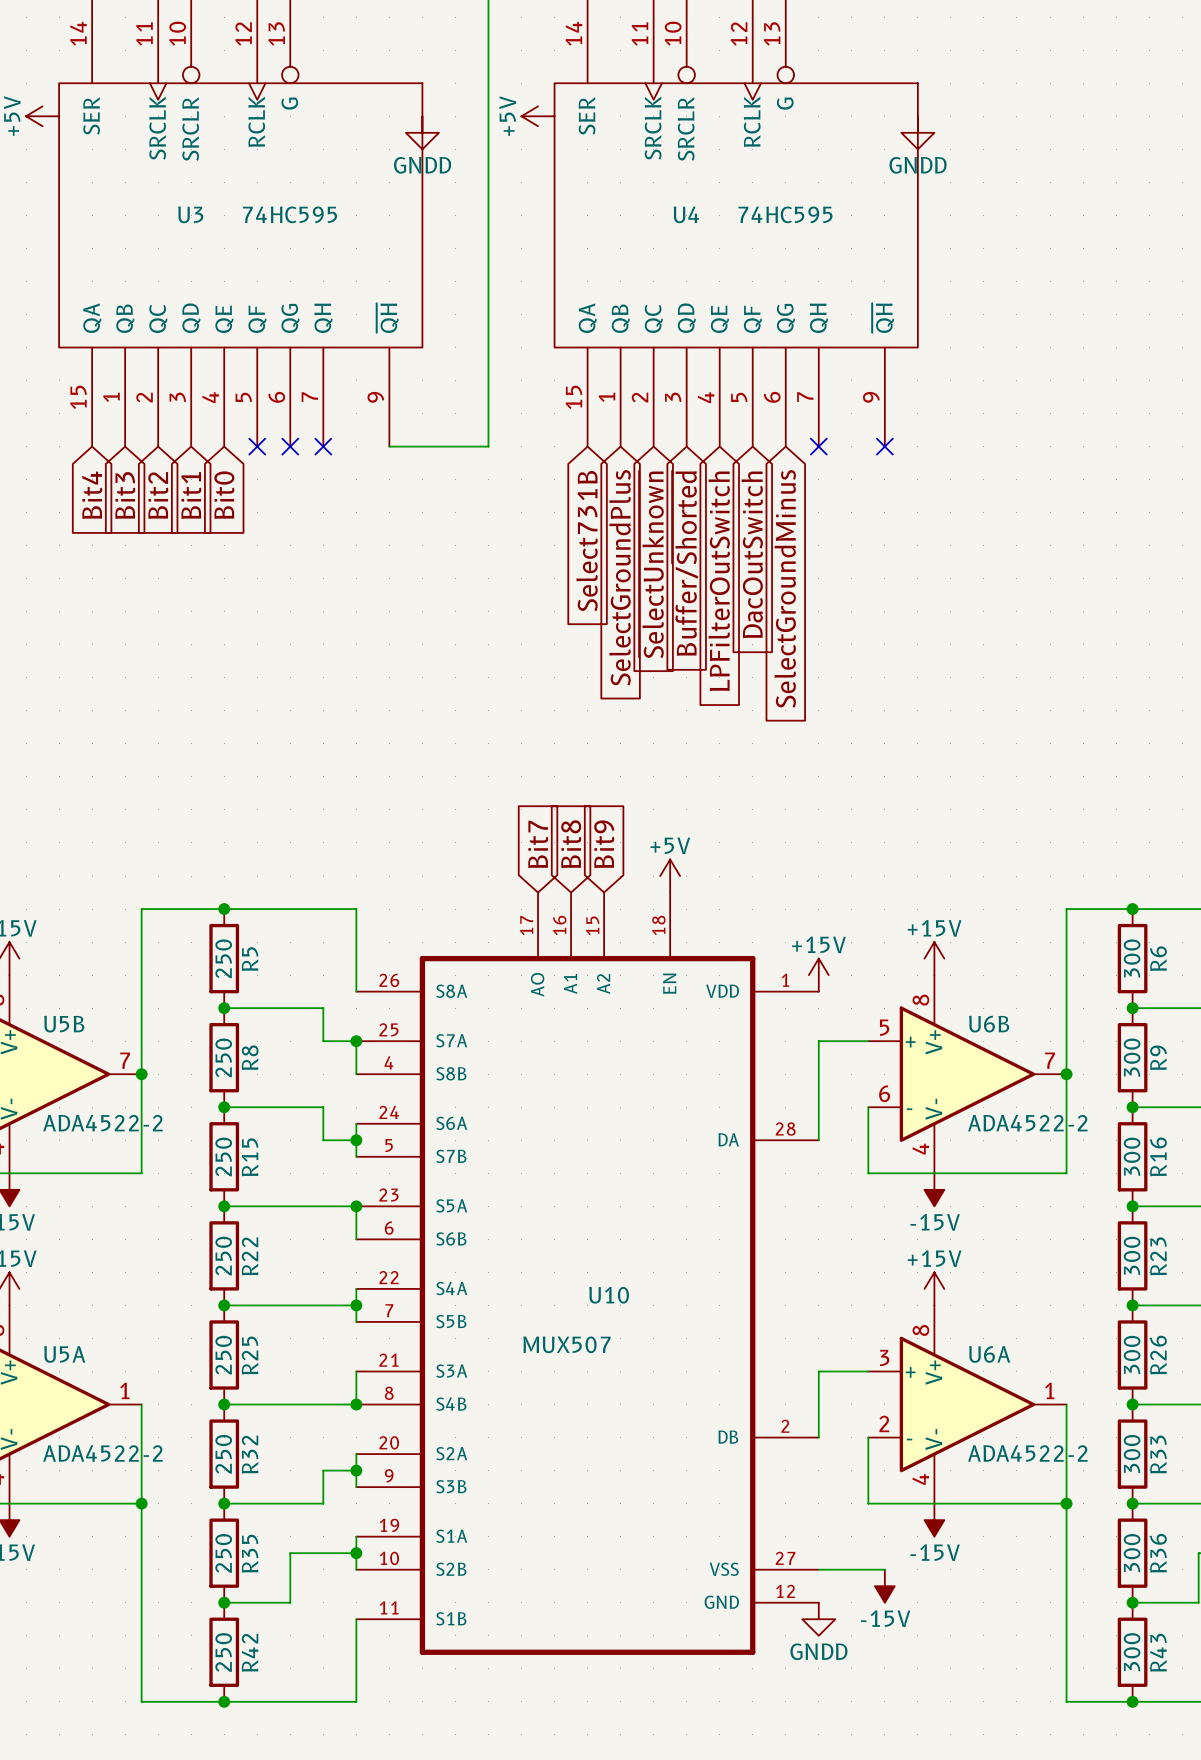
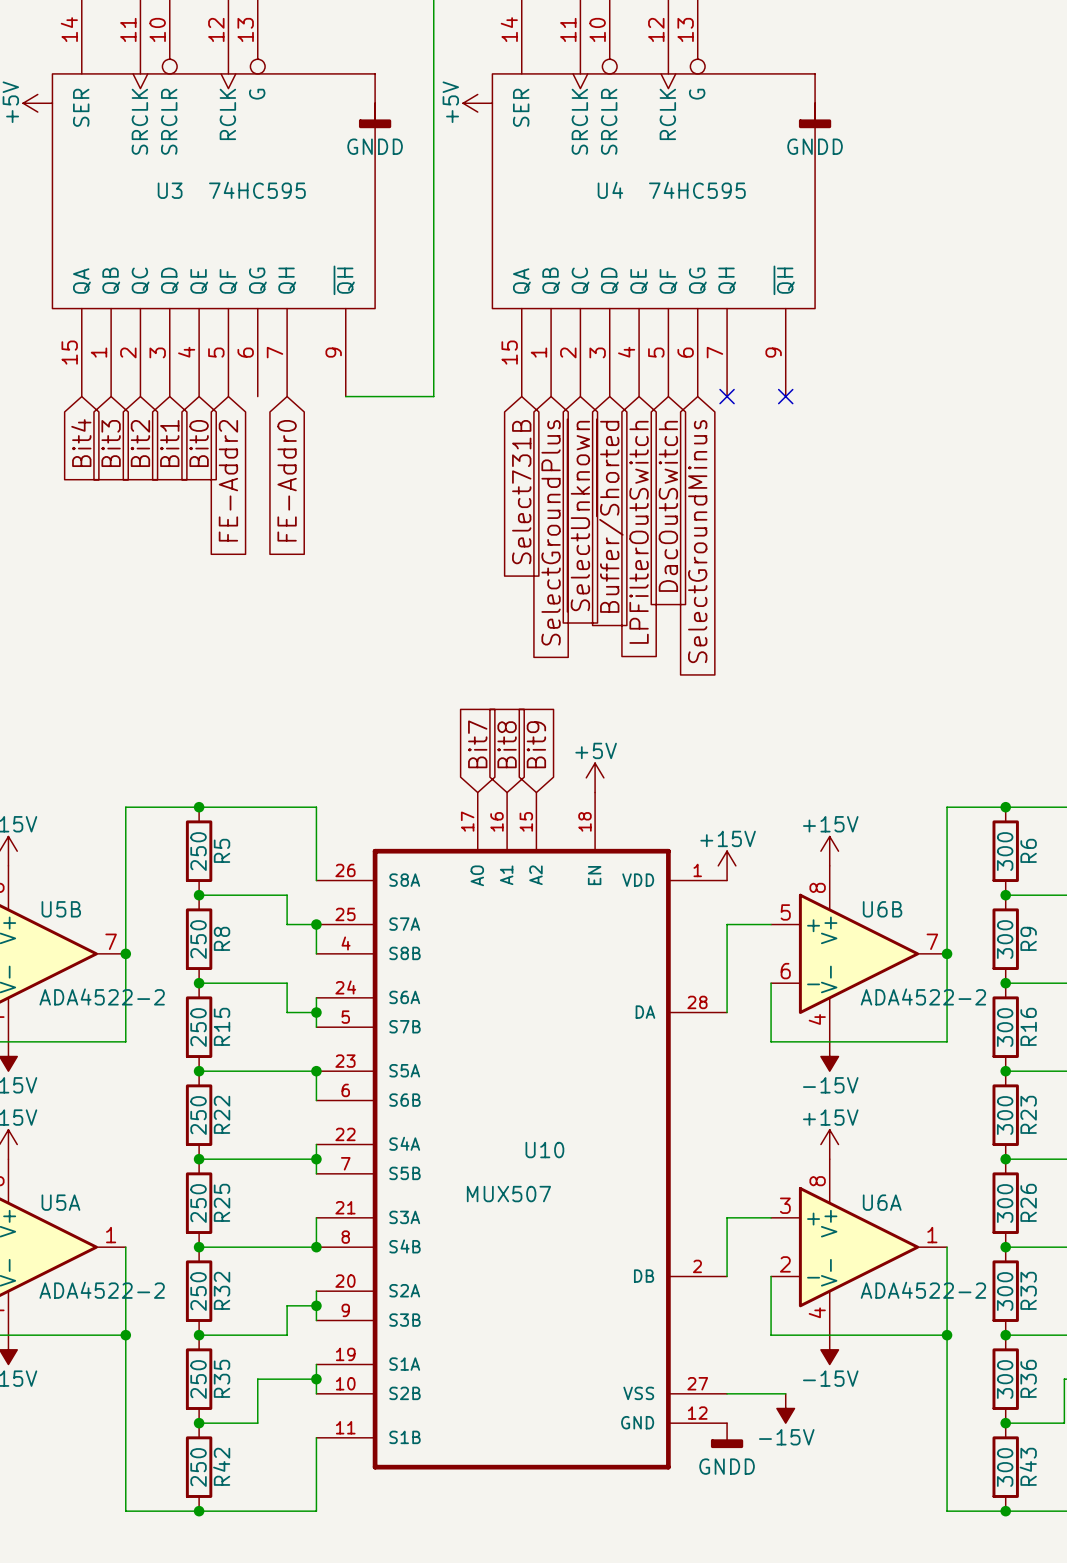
power symbol shape: [405, 116, 439, 150] -> [358, 103, 392, 129]
power symbol shape: [901, 116, 935, 150] -> [798, 103, 832, 129]
no-connect mark: (257, 446) -> none
no-connect mark: (290, 446) -> none
no-connect mark: (323, 446) -> none
global label: none -> FE-Addr0 (287, 480)
global label: none -> FE-Addr2 (228, 480)
power symbol shape: [802, 1602, 836, 1636] -> [710, 1423, 744, 1449]

